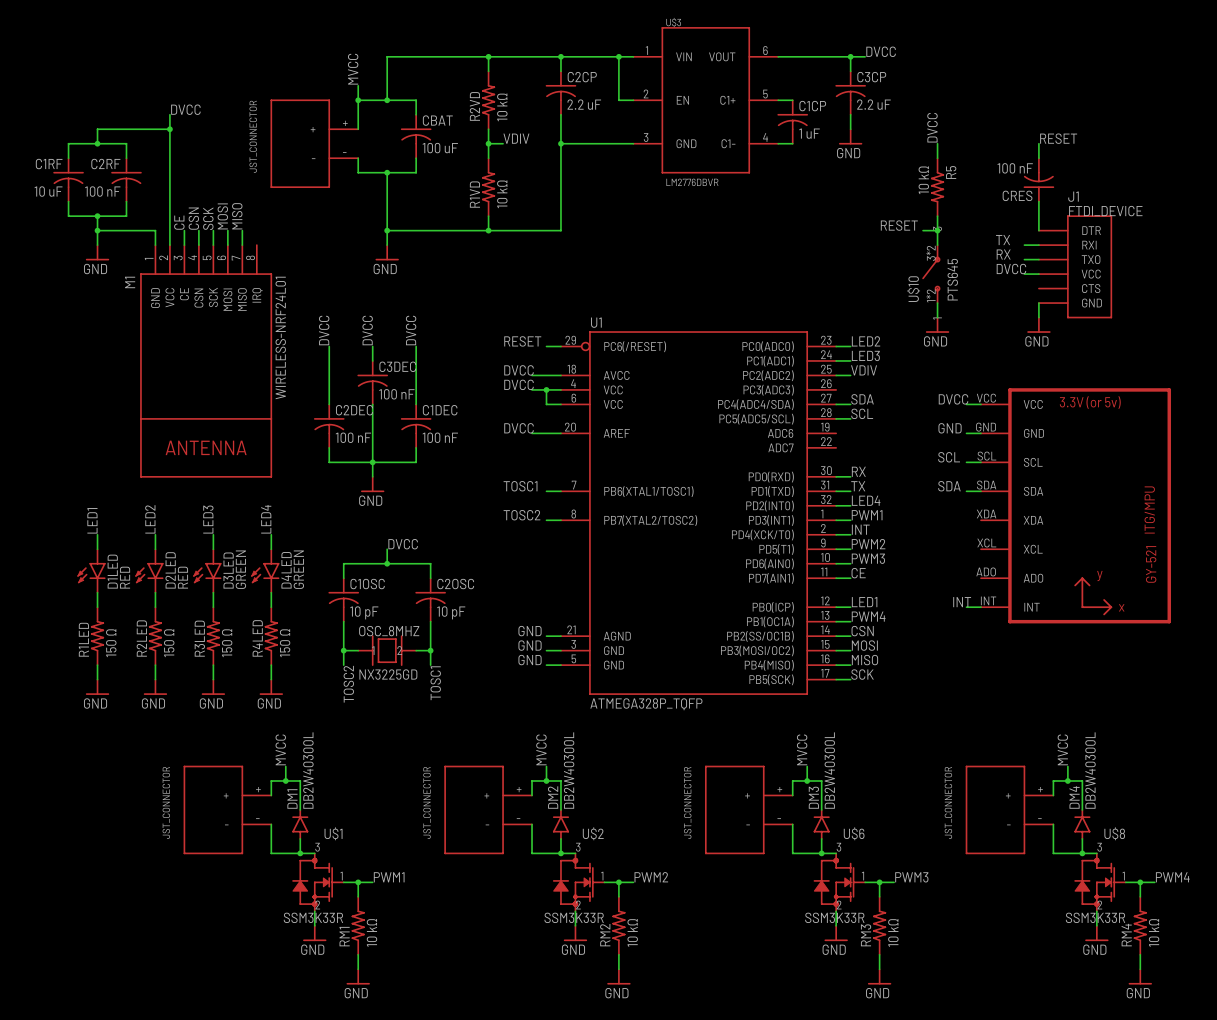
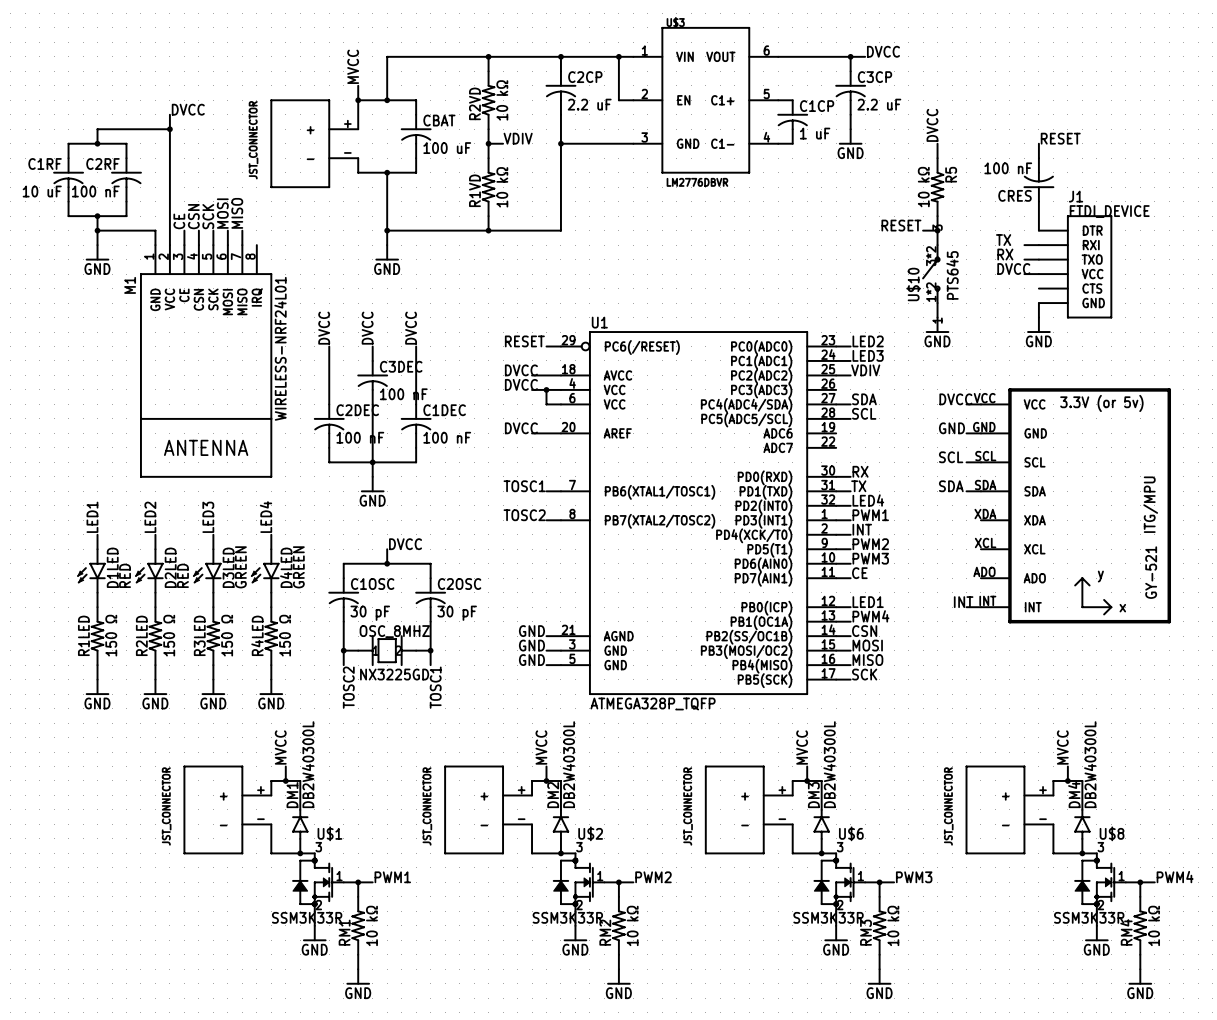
C1OSC value: 10 pF (364, 612) -> 30 pF (370, 613)
C2OSC value: 10 pF (451, 612) -> 30 pF (457, 613)

